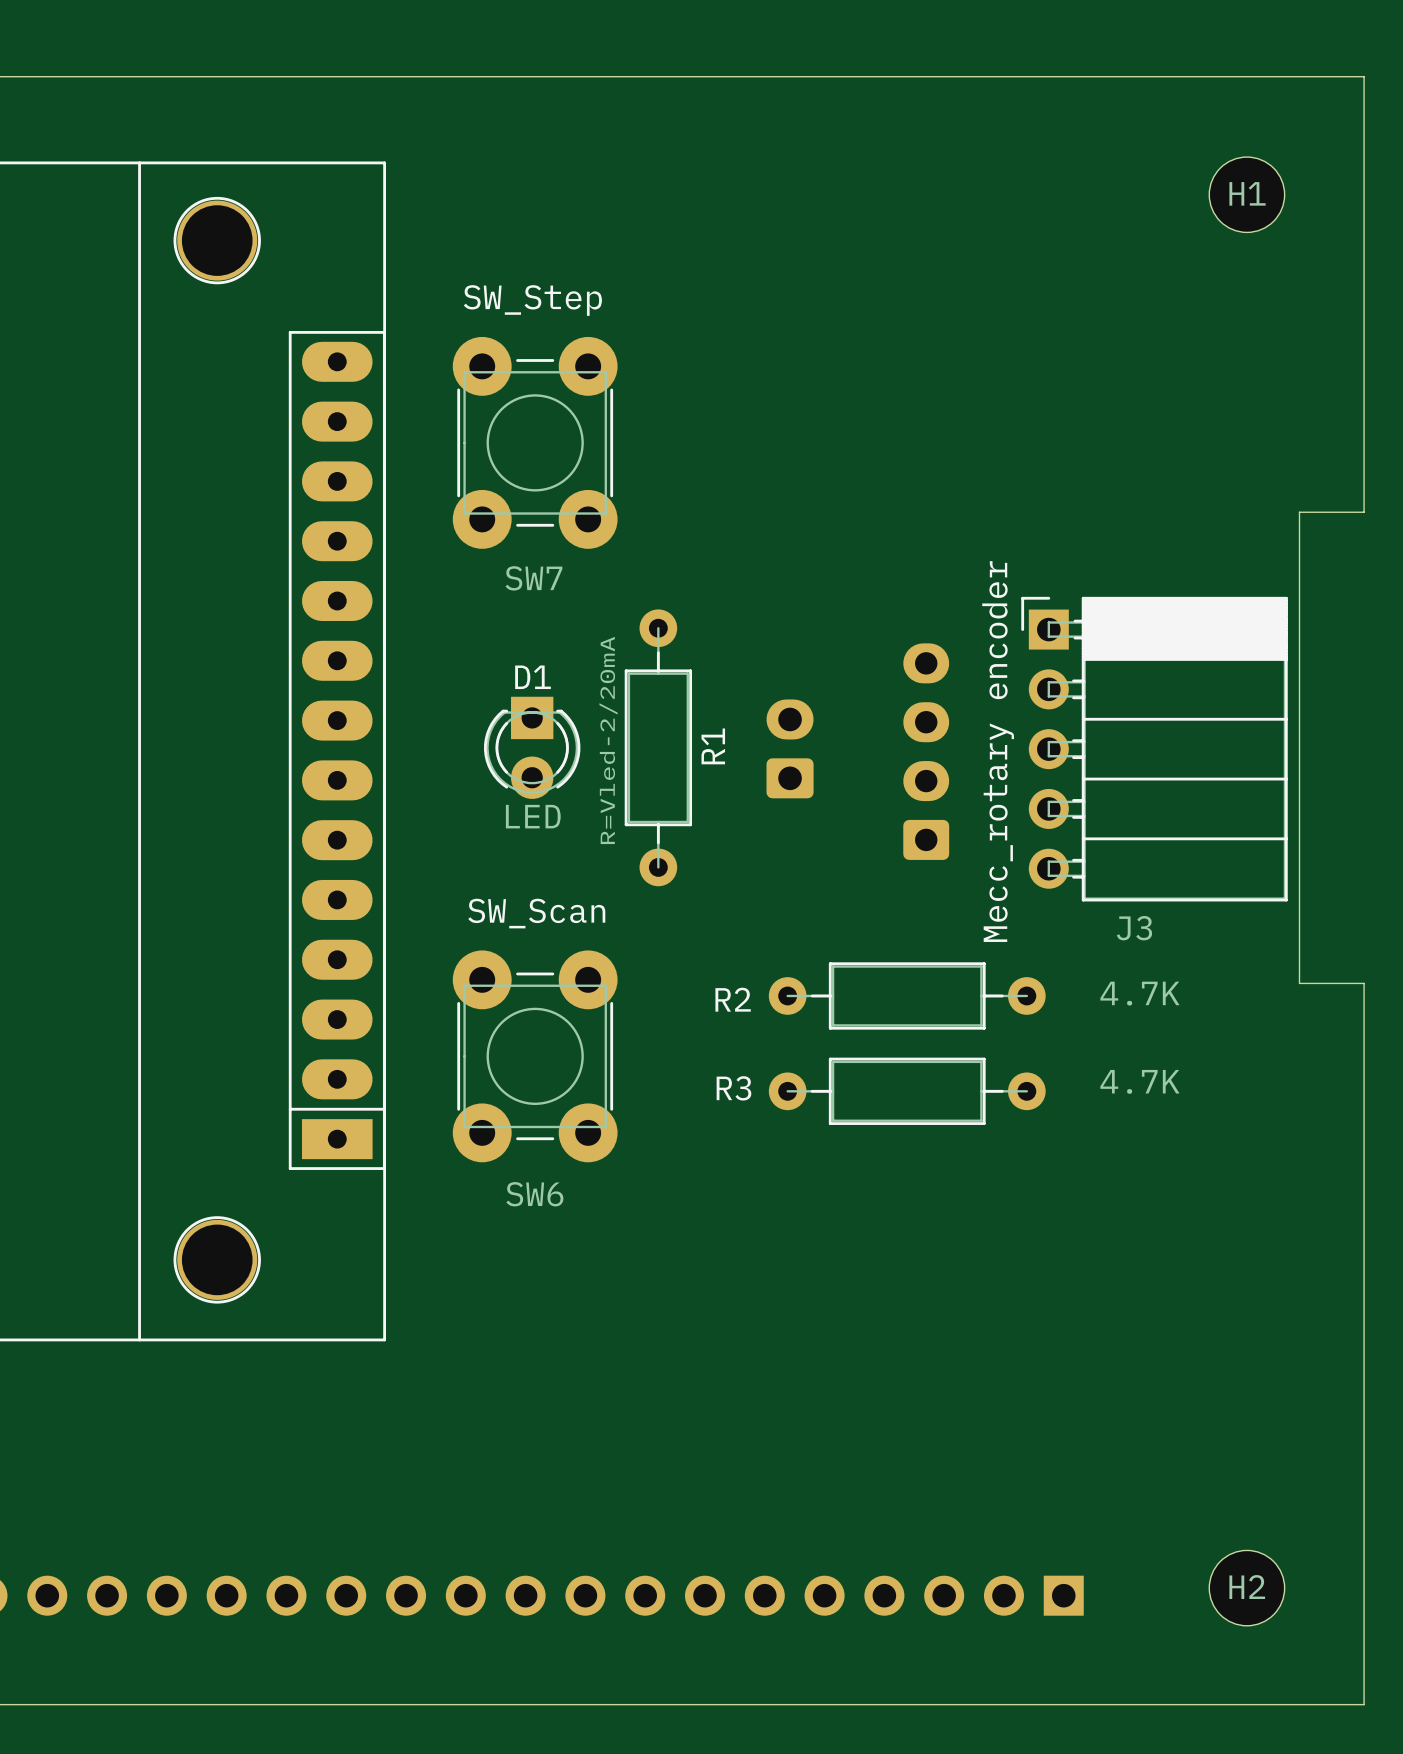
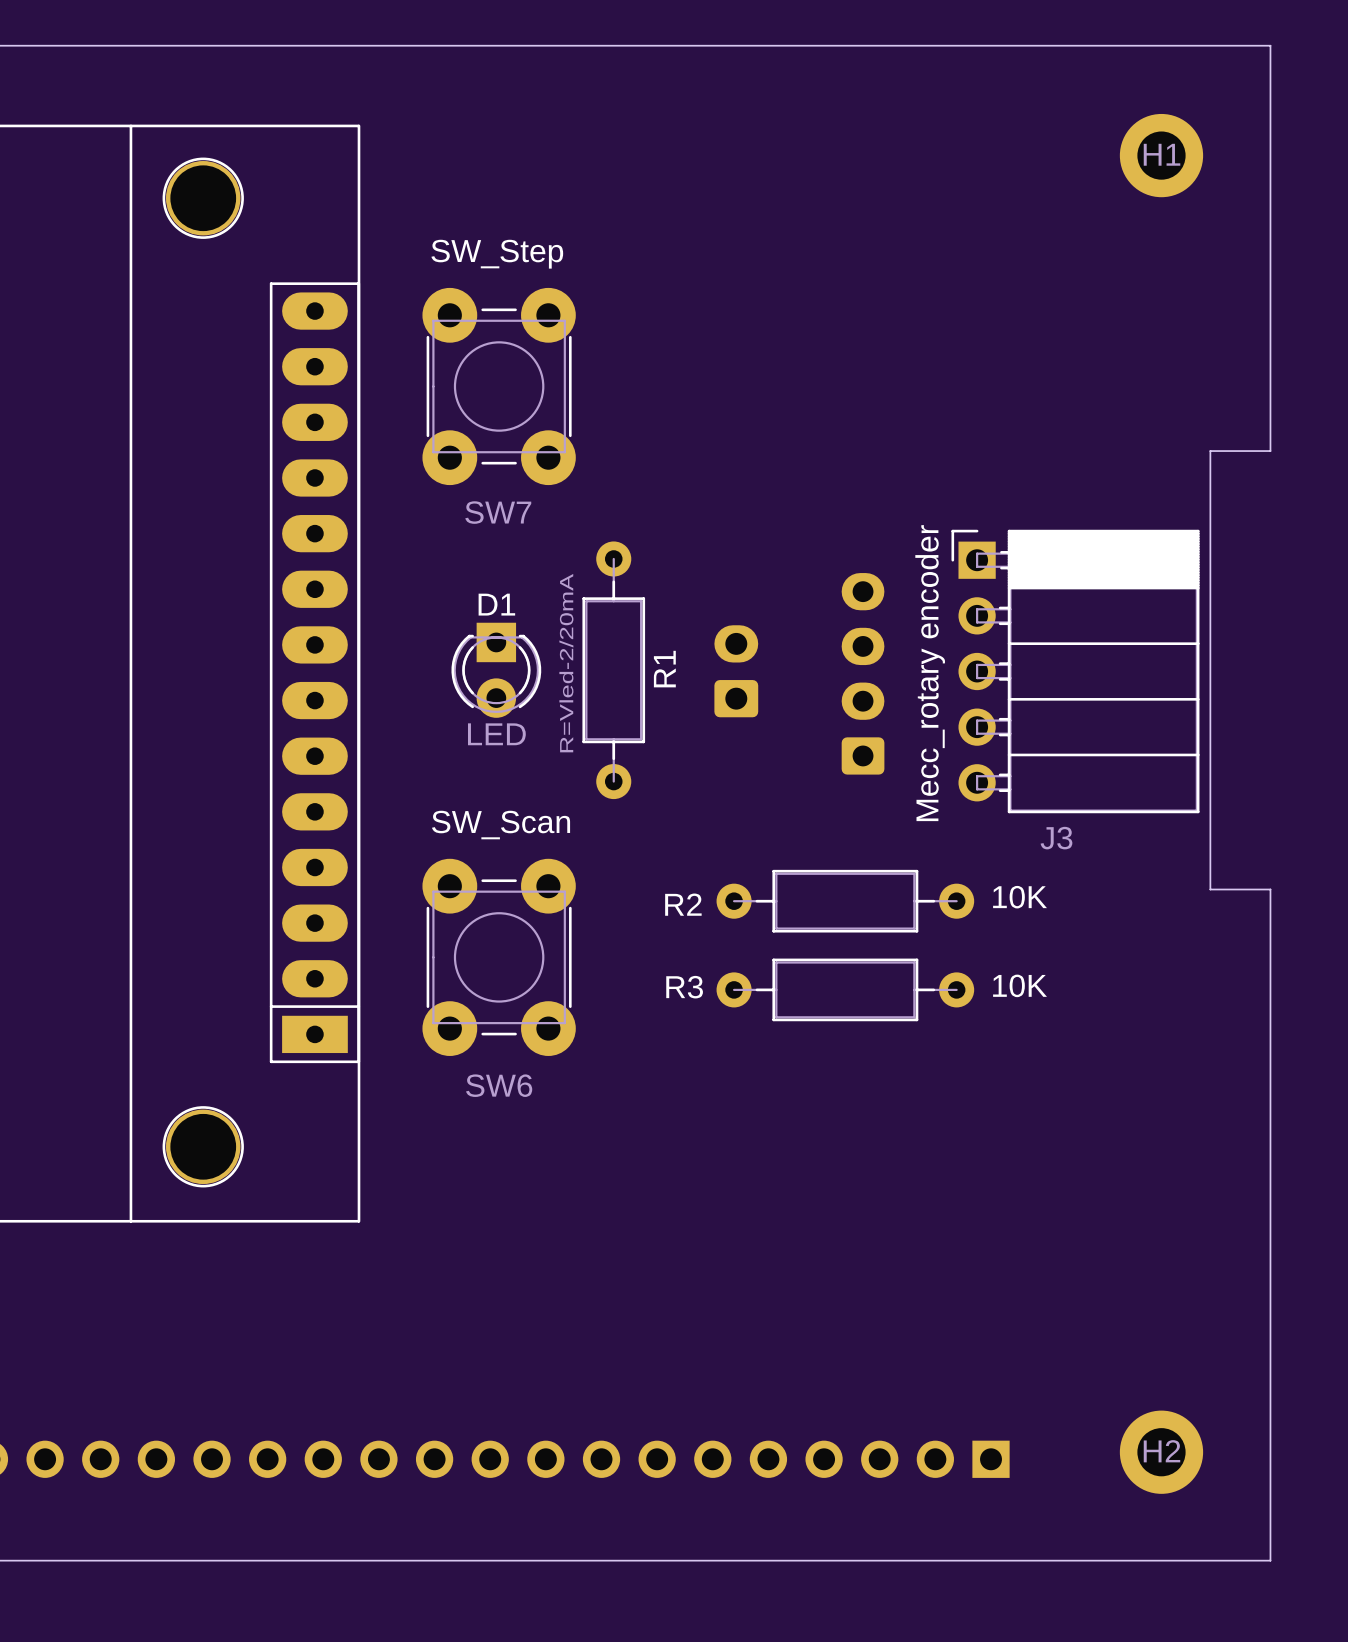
H1 footprint: [1209, 157, 1285, 233] -> [1119, 113, 1204, 198]
R2 value: 4.7K (1139, 993) -> 10K (1020, 897)
R3 value: 4.7K (1139, 1081) -> 10K (1020, 985)
H2 footprint: [1209, 1550, 1285, 1626] -> [1119, 1410, 1204, 1494]

